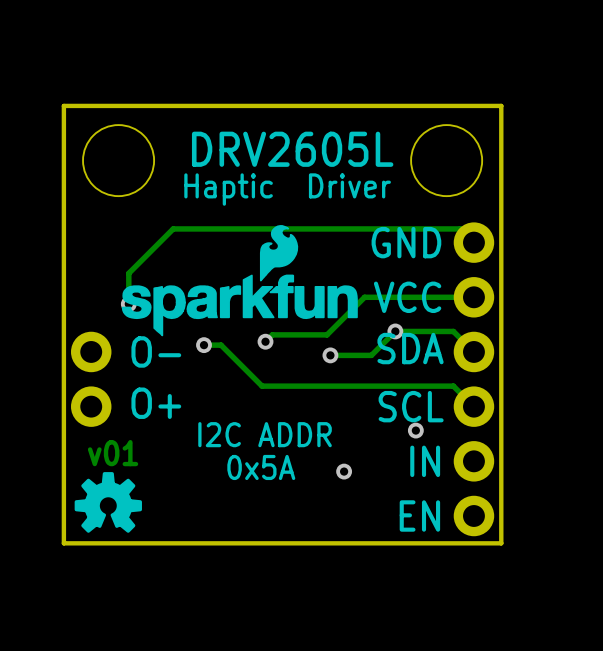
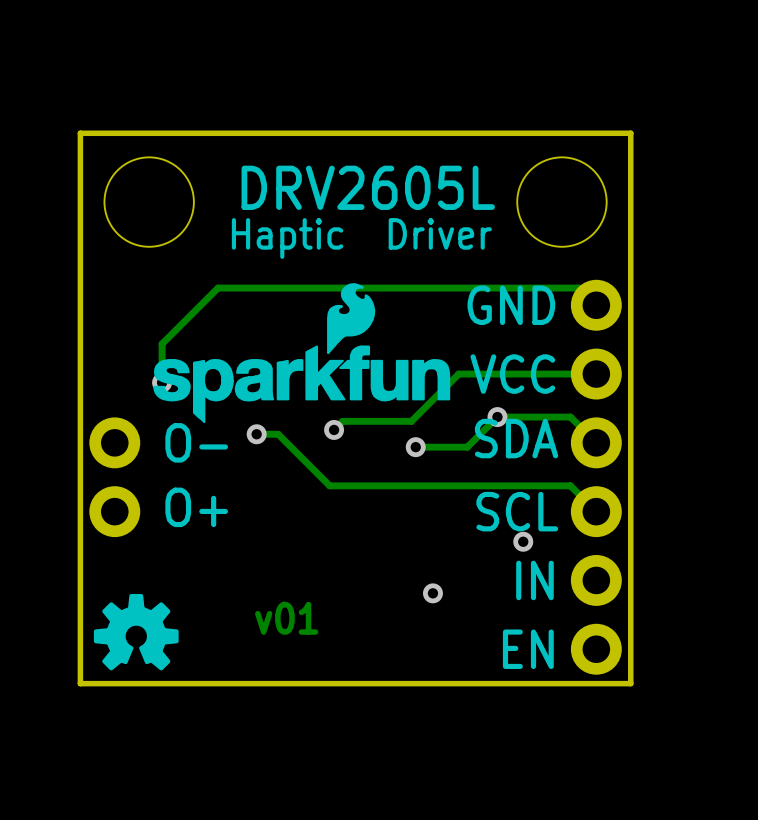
text: I2C ADDR (265, 434) -> none
text position: v01 (113, 453) -> v01 (286, 618)
text: 0x5A (261, 467) -> none

